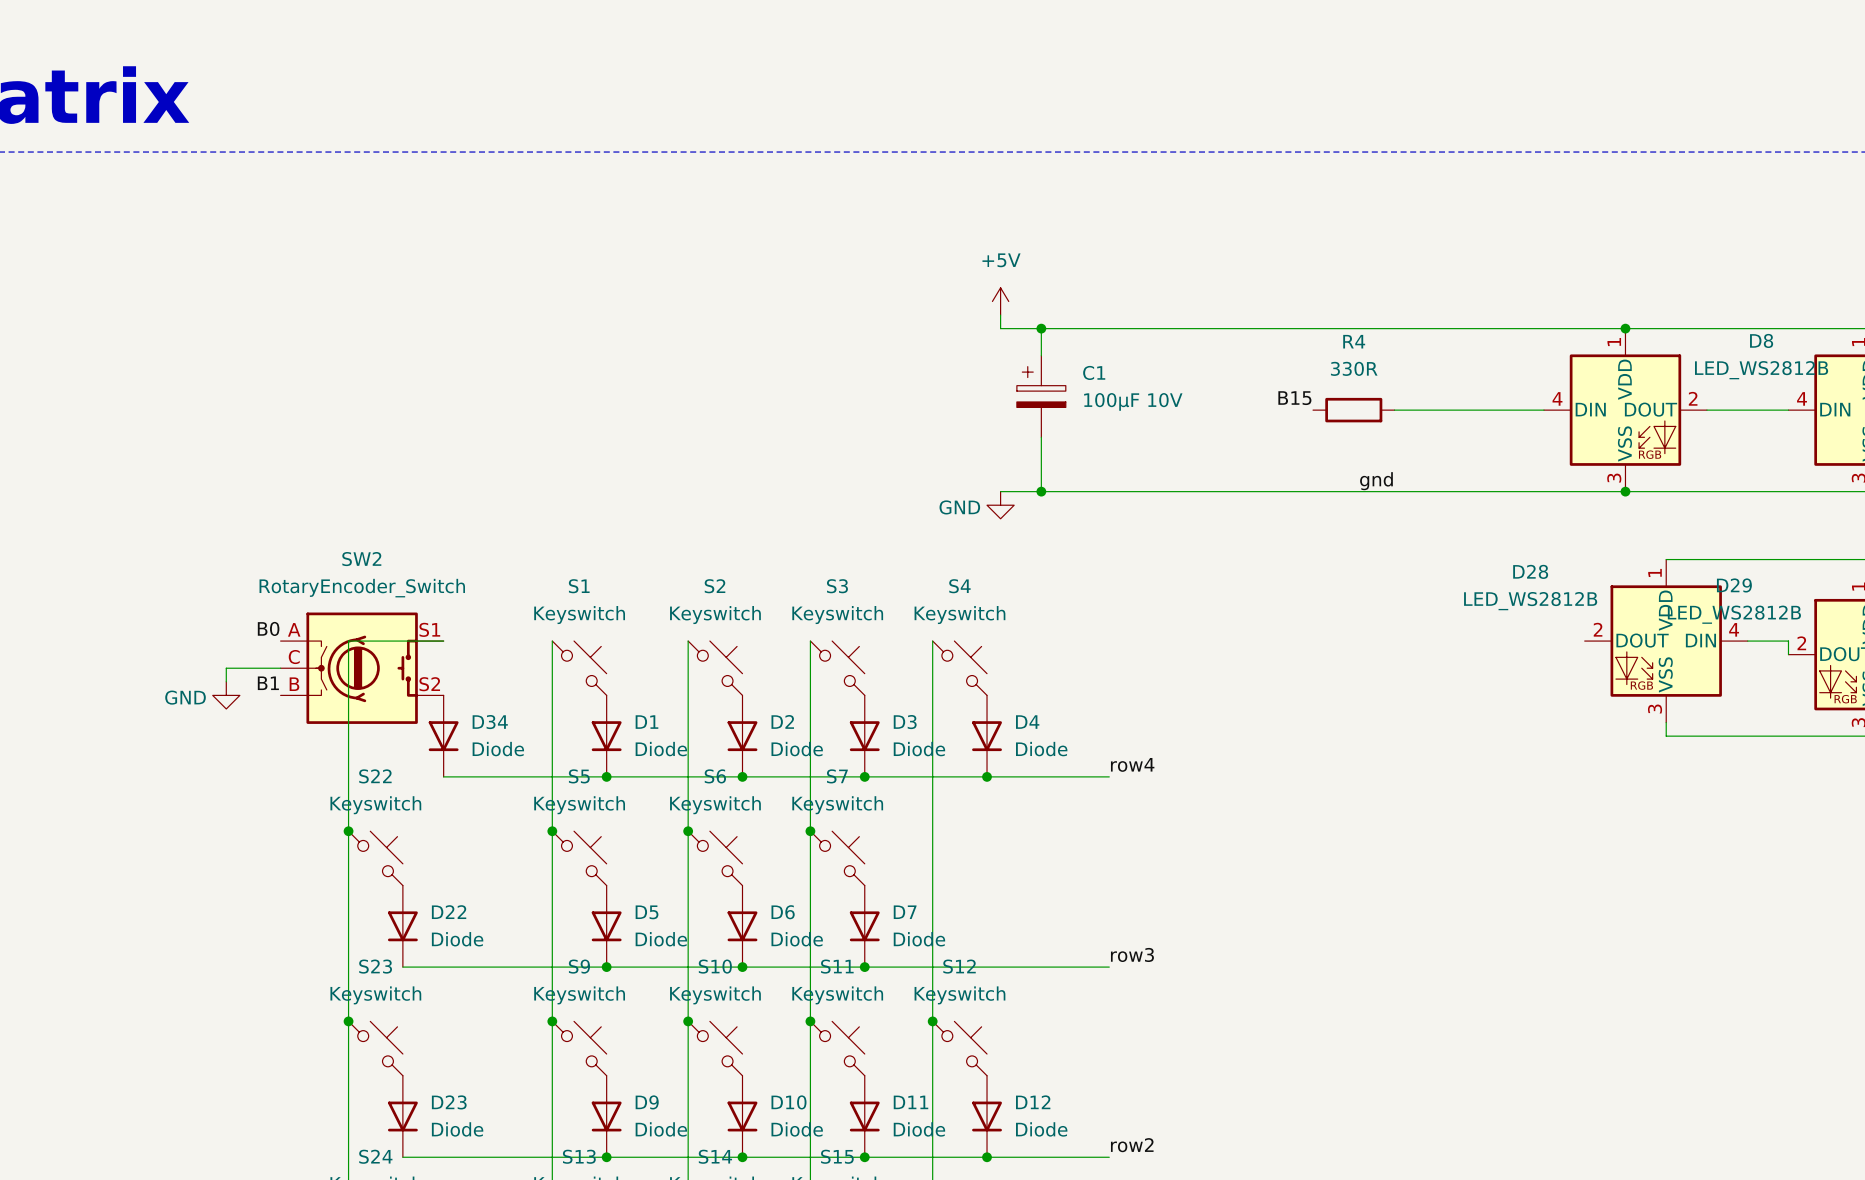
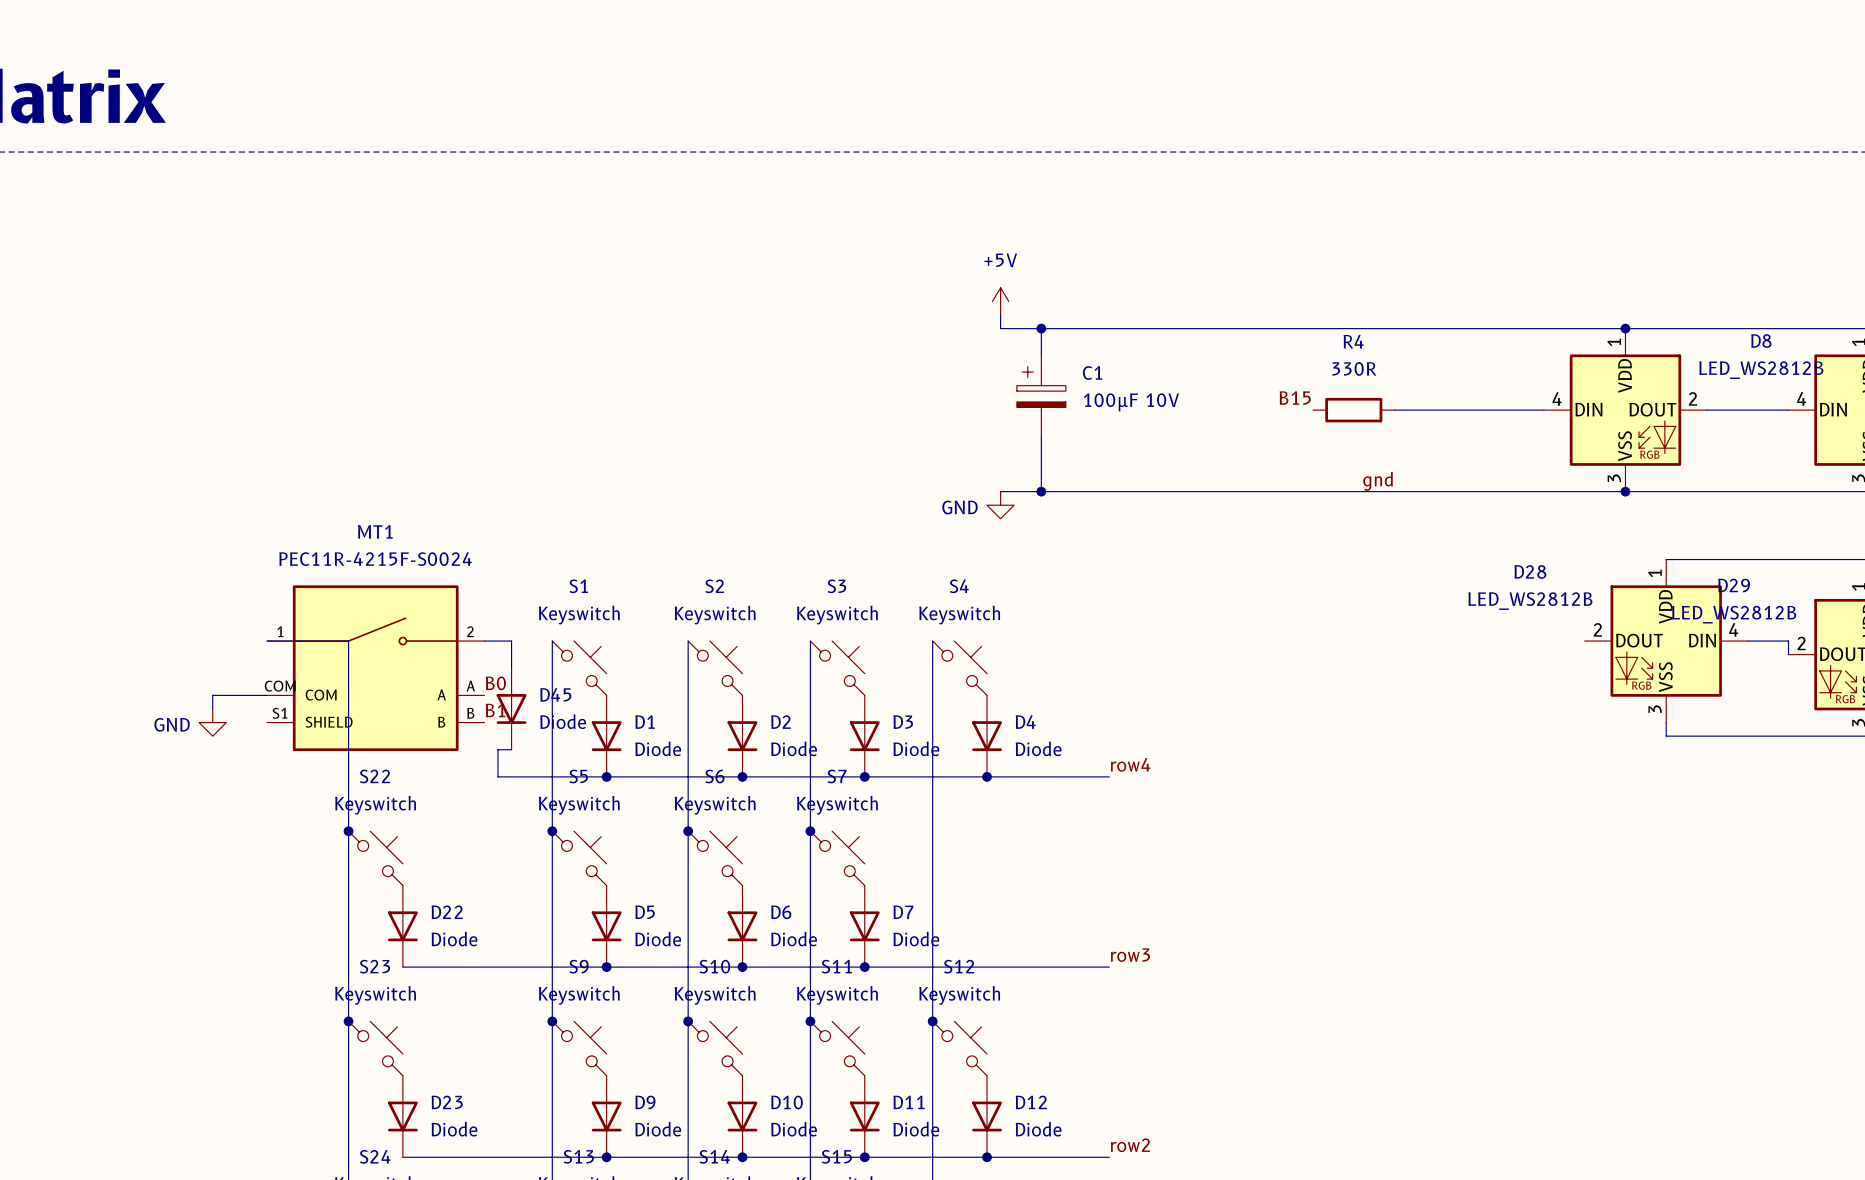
label position: B0 (268, 628) -> B0 (495, 683)
wire: none -> (484, 641) (511, 641) (511, 668)
wire: (280, 668) (226, 668) (226, 681) -> (267, 695) (212, 695) (212, 708)
SW2: RotaryEncoder_Switch (362, 668) -> none
MT1: none -> PEC11R-4215F-S0024 (375, 668)
label position: B1 (268, 683) -> B1 (495, 710)
power symbol position: GND (226, 695) -> GND (212, 722)
D45: none -> Diode (511, 708)
D34: Diode (443, 736) -> none
wire: (443, 776) (497, 776) -> (511, 749) (497, 749) (497, 776)

